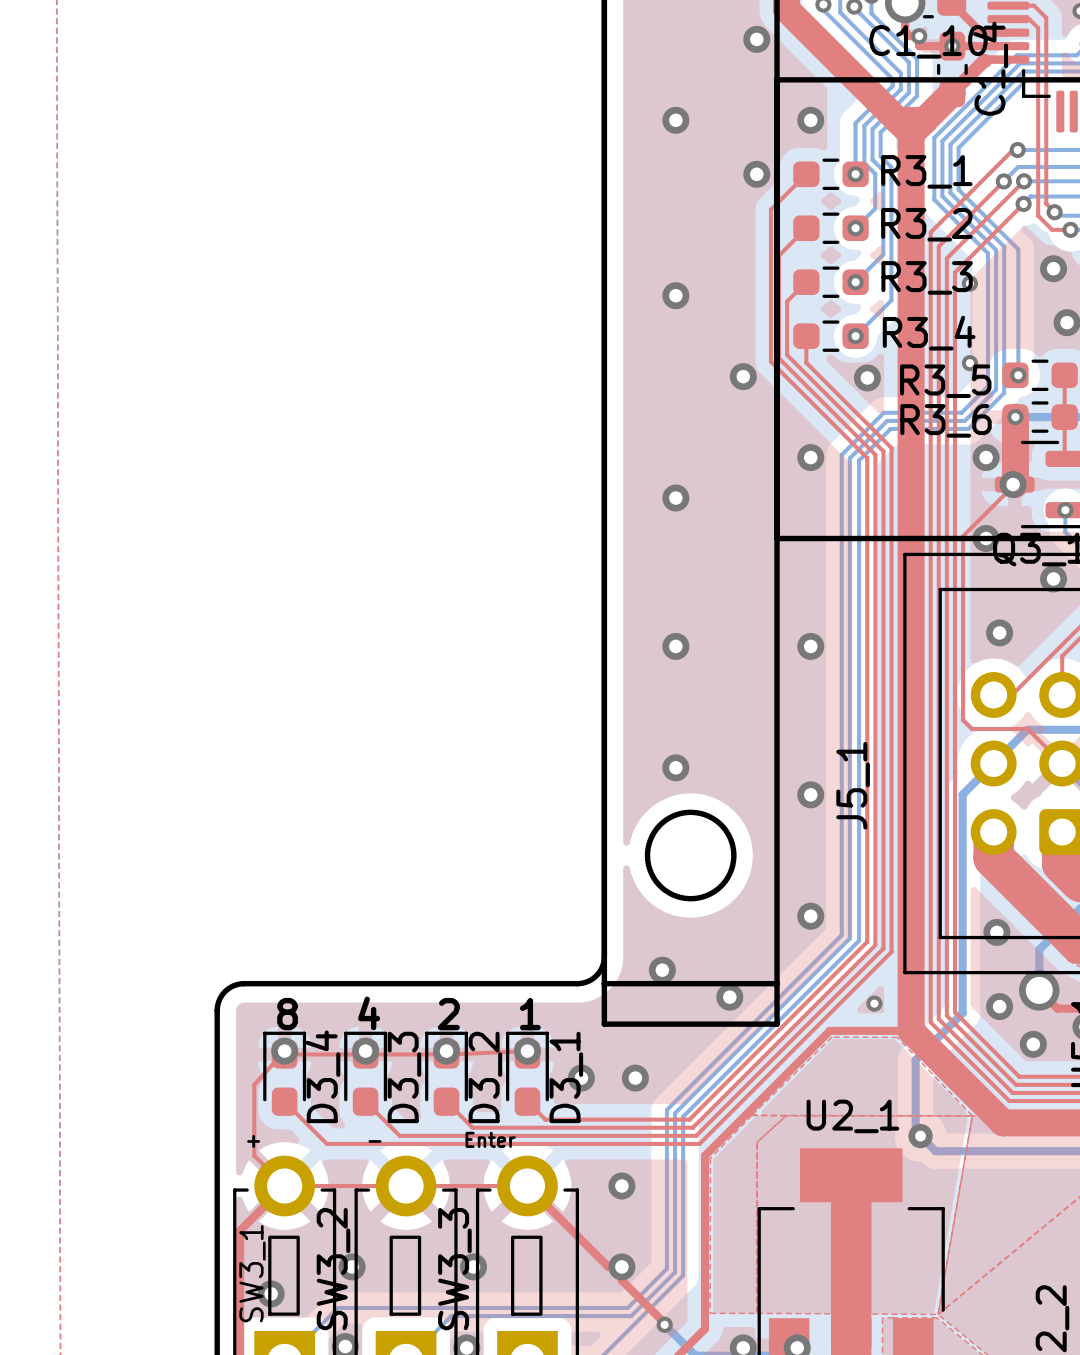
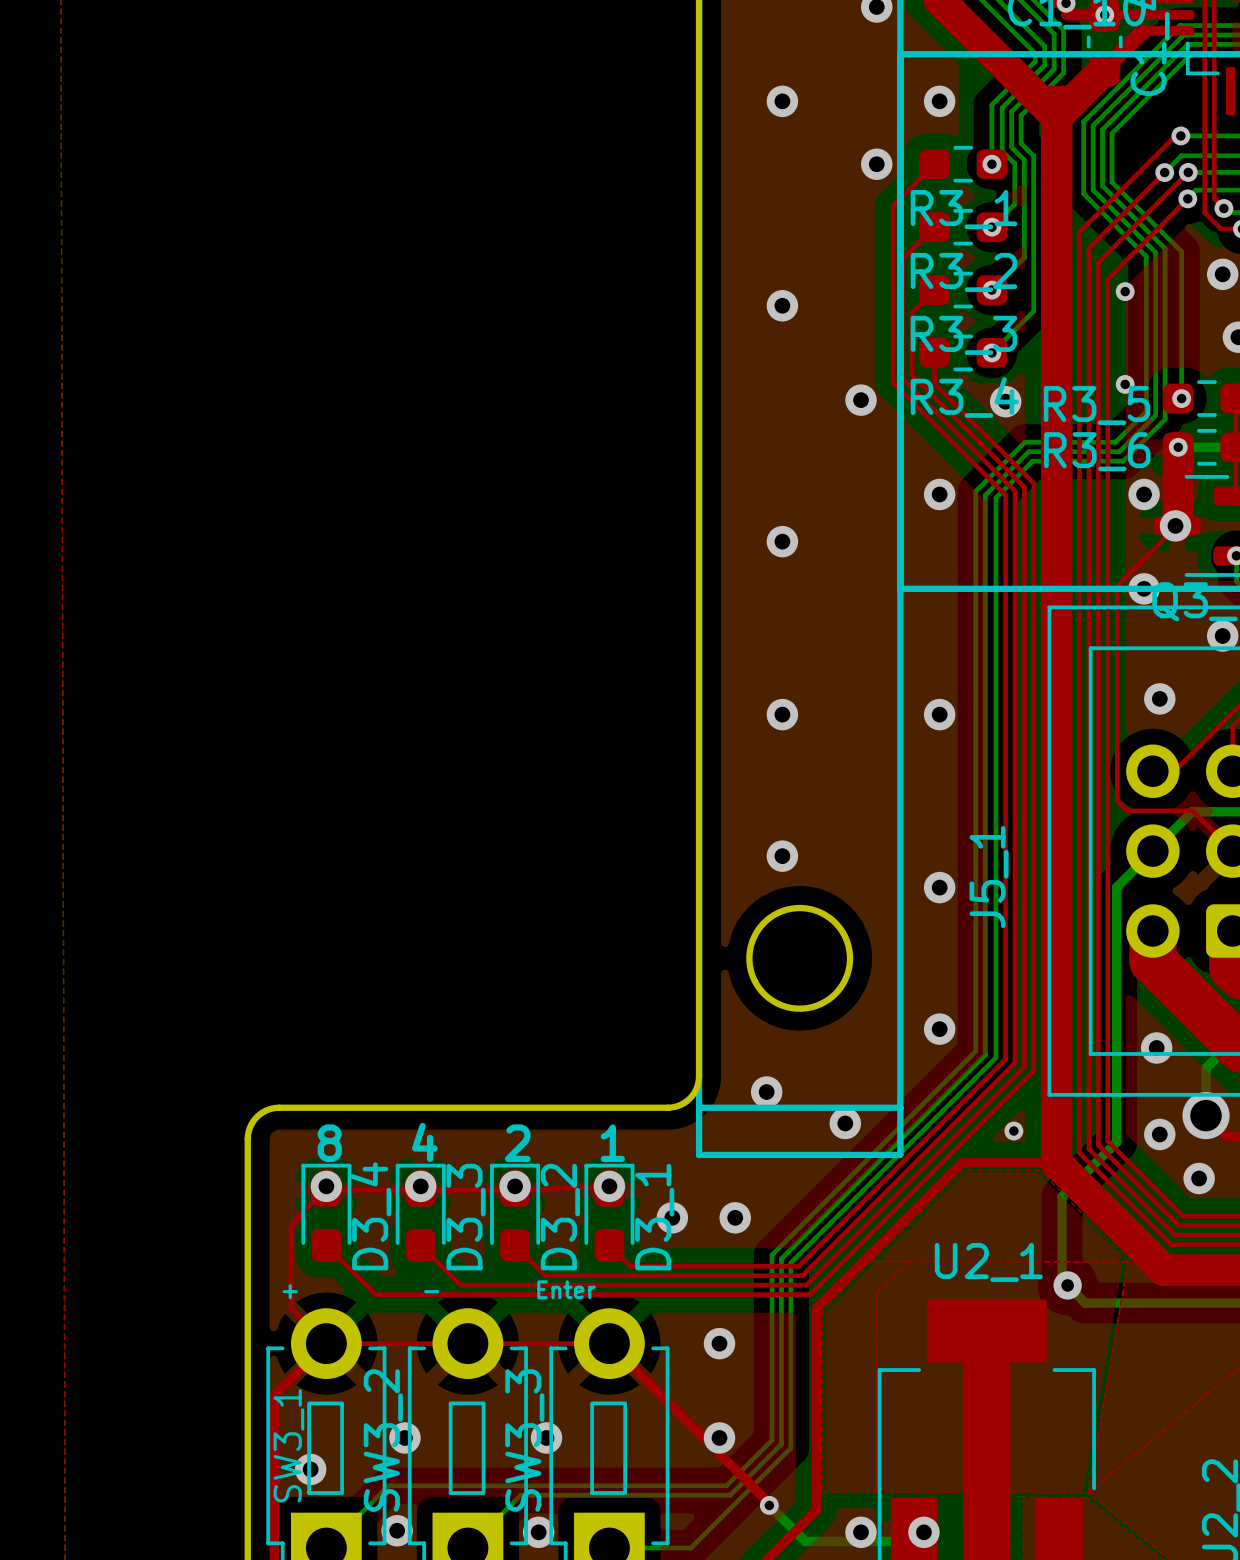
R3_1 name position: R3_1 (926, 171) -> R3_1 (963, 209)
R3_2 name position: R3_2 (926, 224) -> R3_2 (963, 272)
R3_3 name position: R3_3 (927, 277) -> R3_3 (963, 335)
R3_4 name position: R3_4 (929, 333) -> R3_4 (964, 397)

